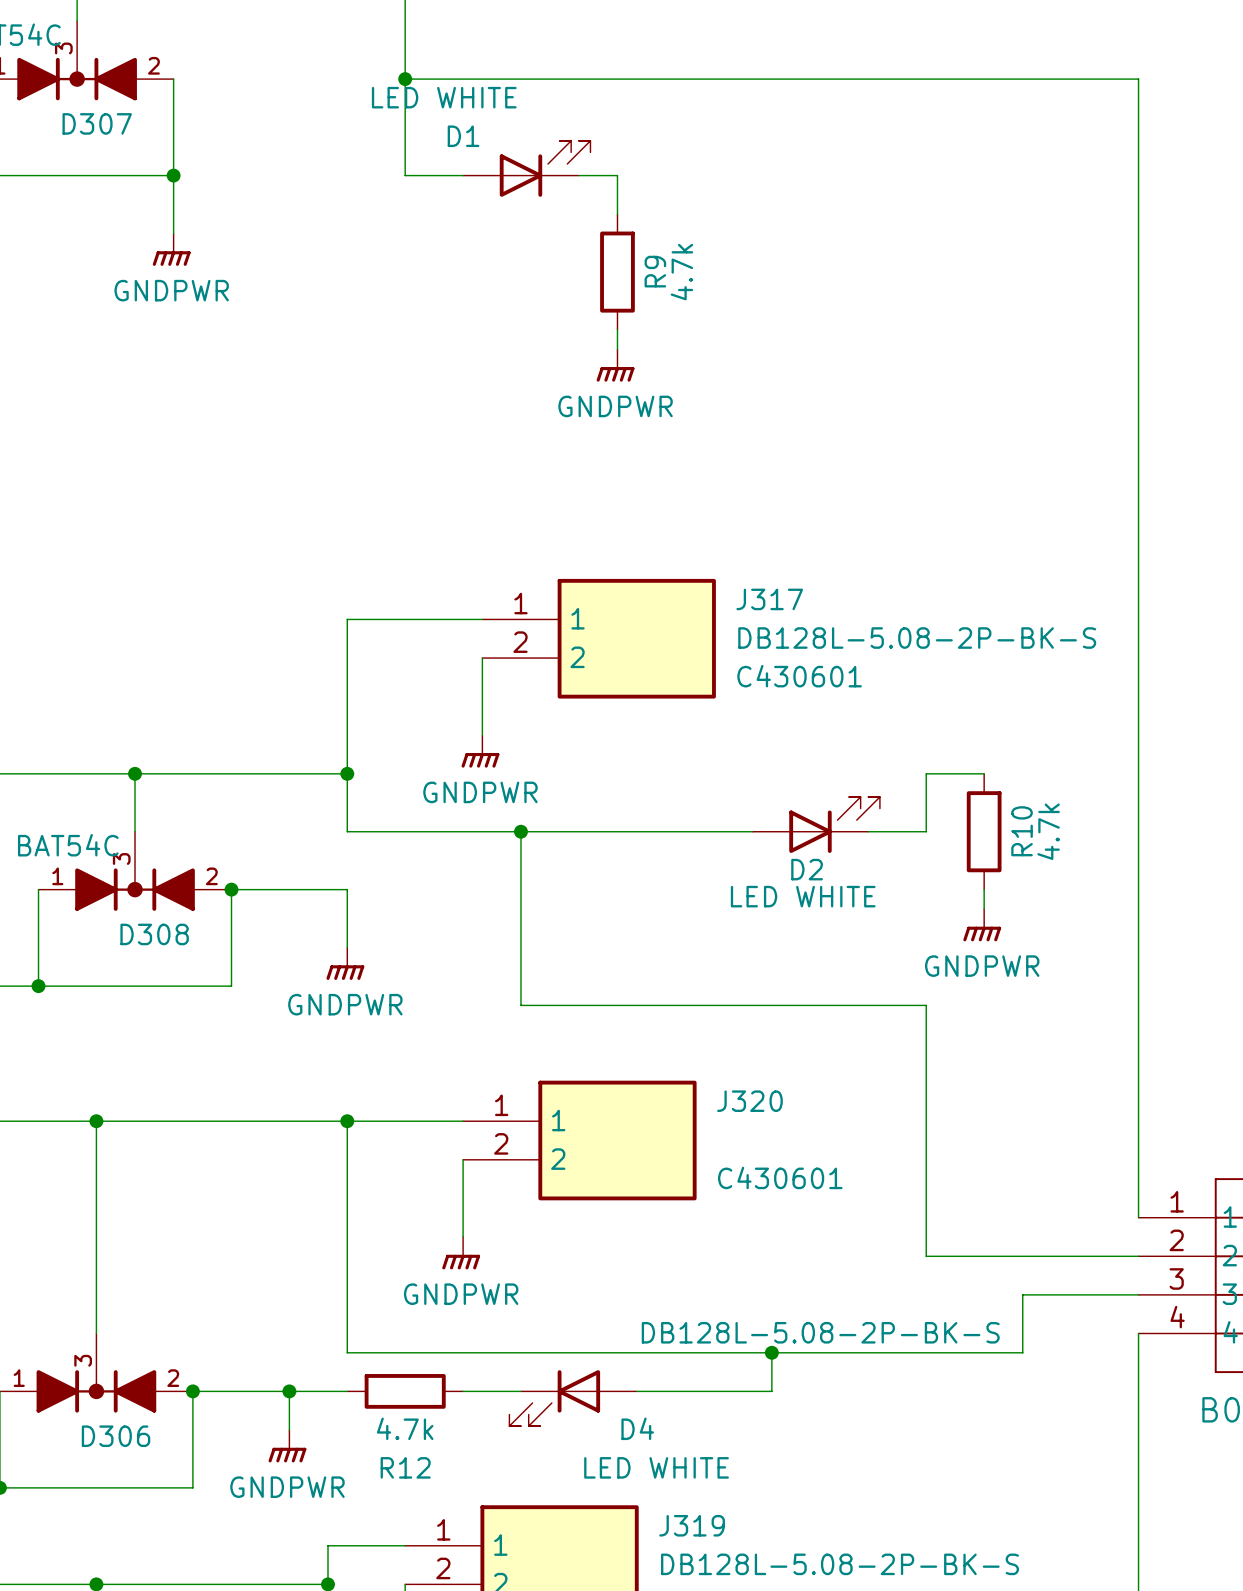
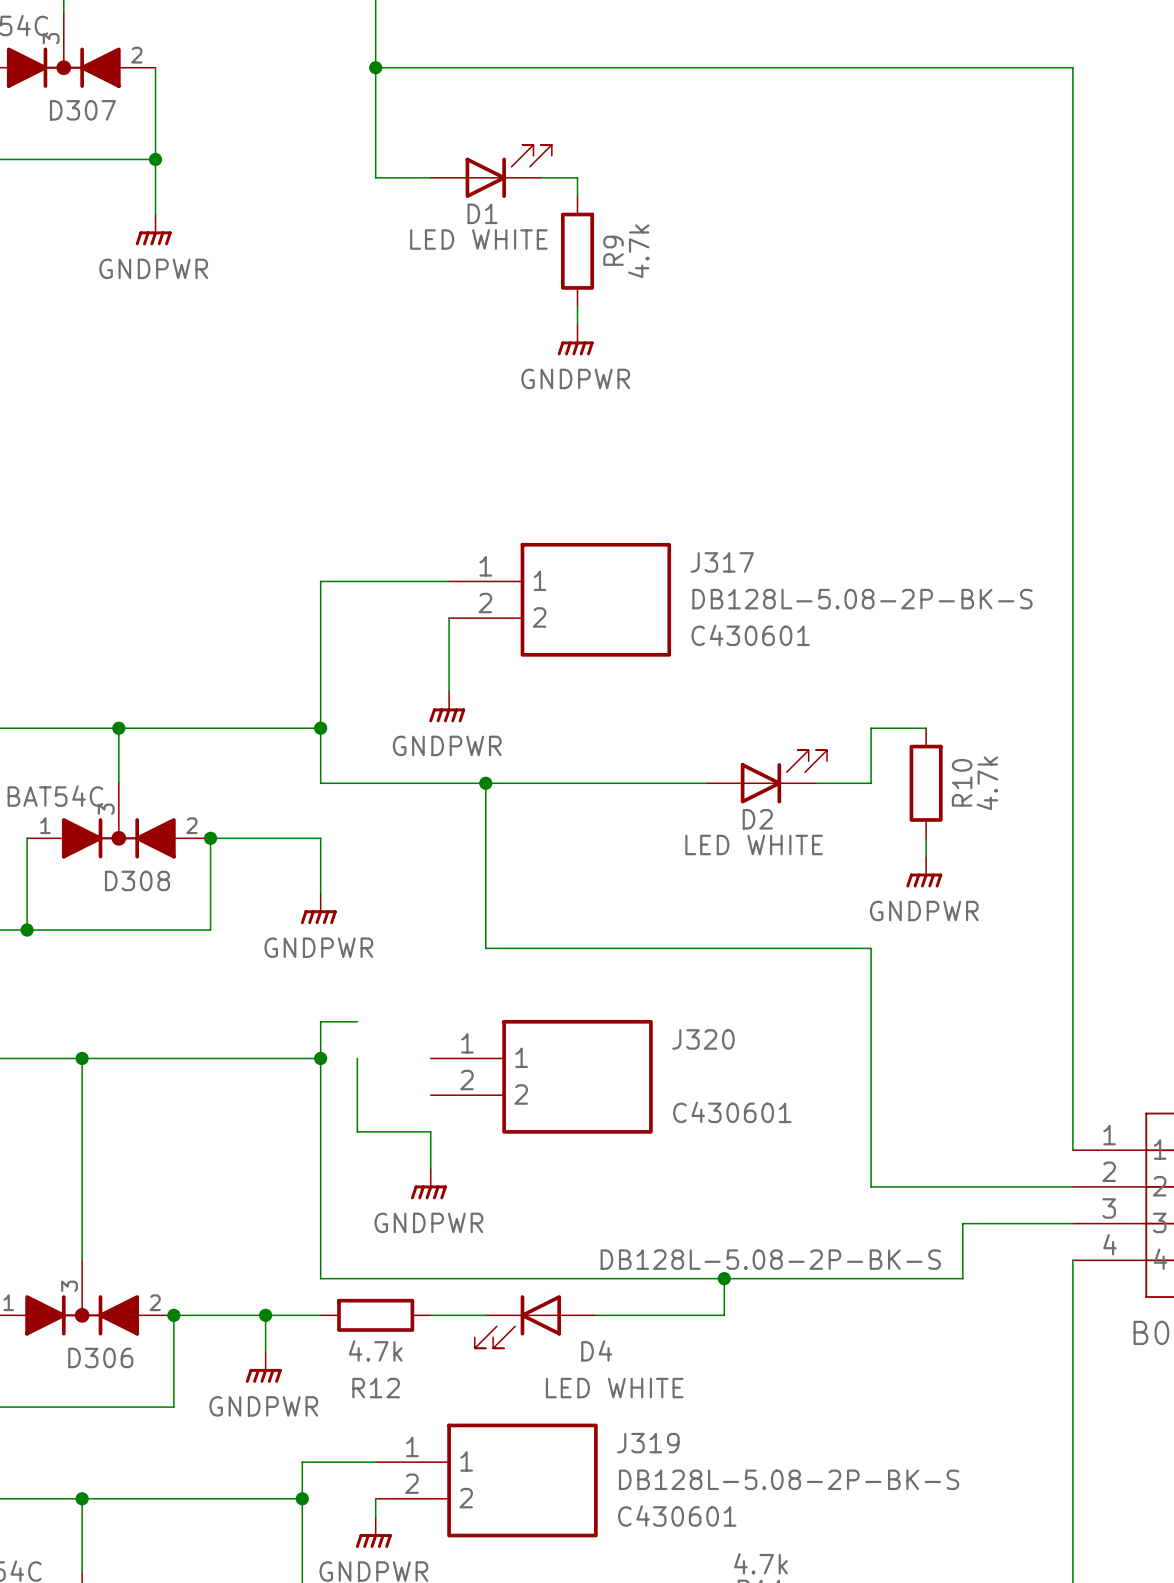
D1 value position: LED WHITE (444, 97) -> LED WHITE (478, 239)
D1 name position: D1 (463, 136) -> D1 (482, 213)
D1 position: (526, 168) -> (491, 171)
wire: (405, 175) (463, 175) -> (375, 159) (375, 177) (430, 177)
wire: (578, 175) (617, 175) (617, 194) -> (540, 177) (577, 177)
wire: (347, 1121) (463, 1121) -> (320, 1058) (320, 1021) (357, 1021)
wire: (463, 1159) (463, 1198) -> (357, 1058) (357, 1131) (430, 1131)

